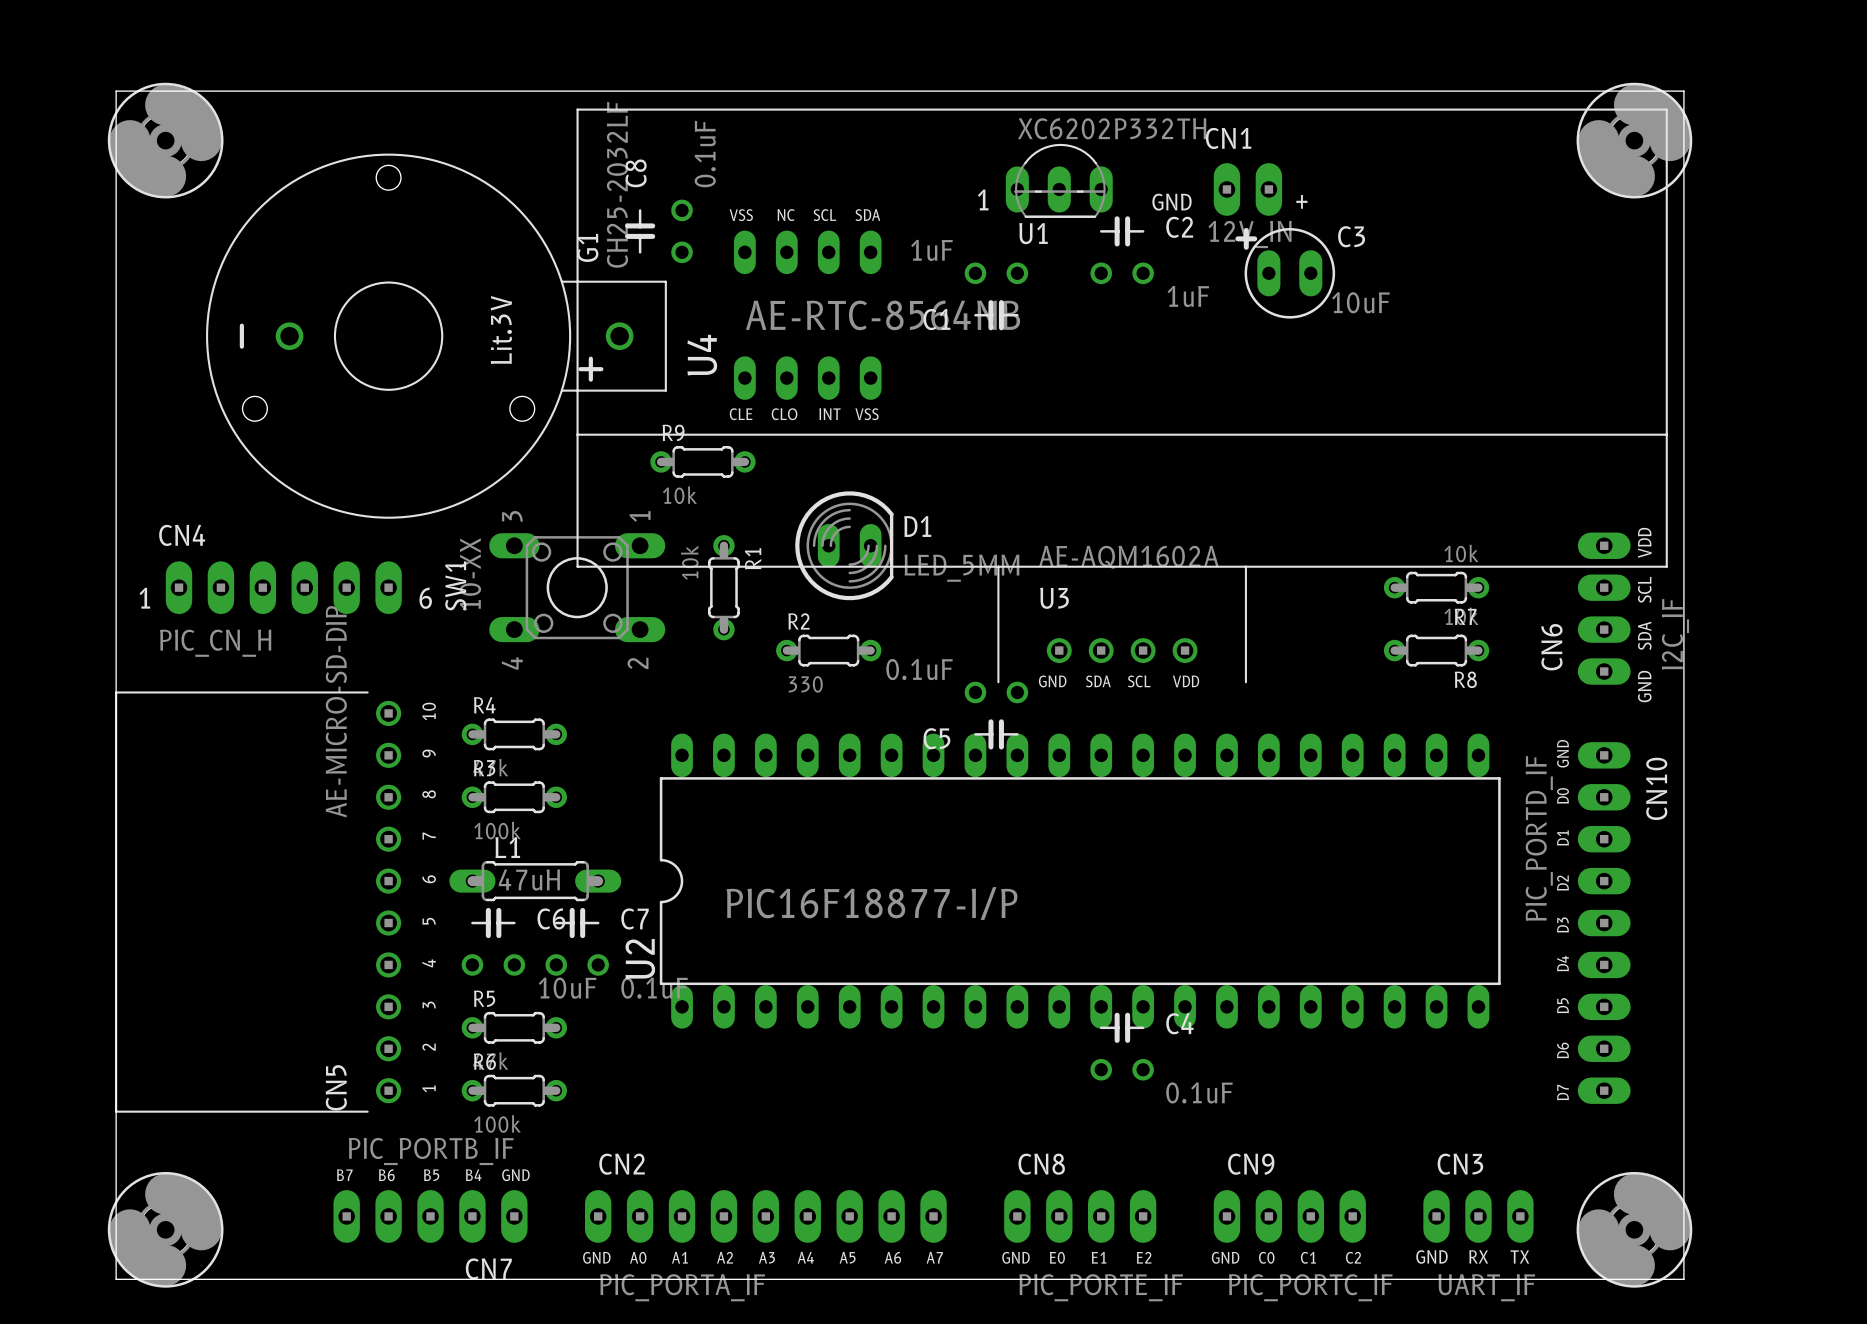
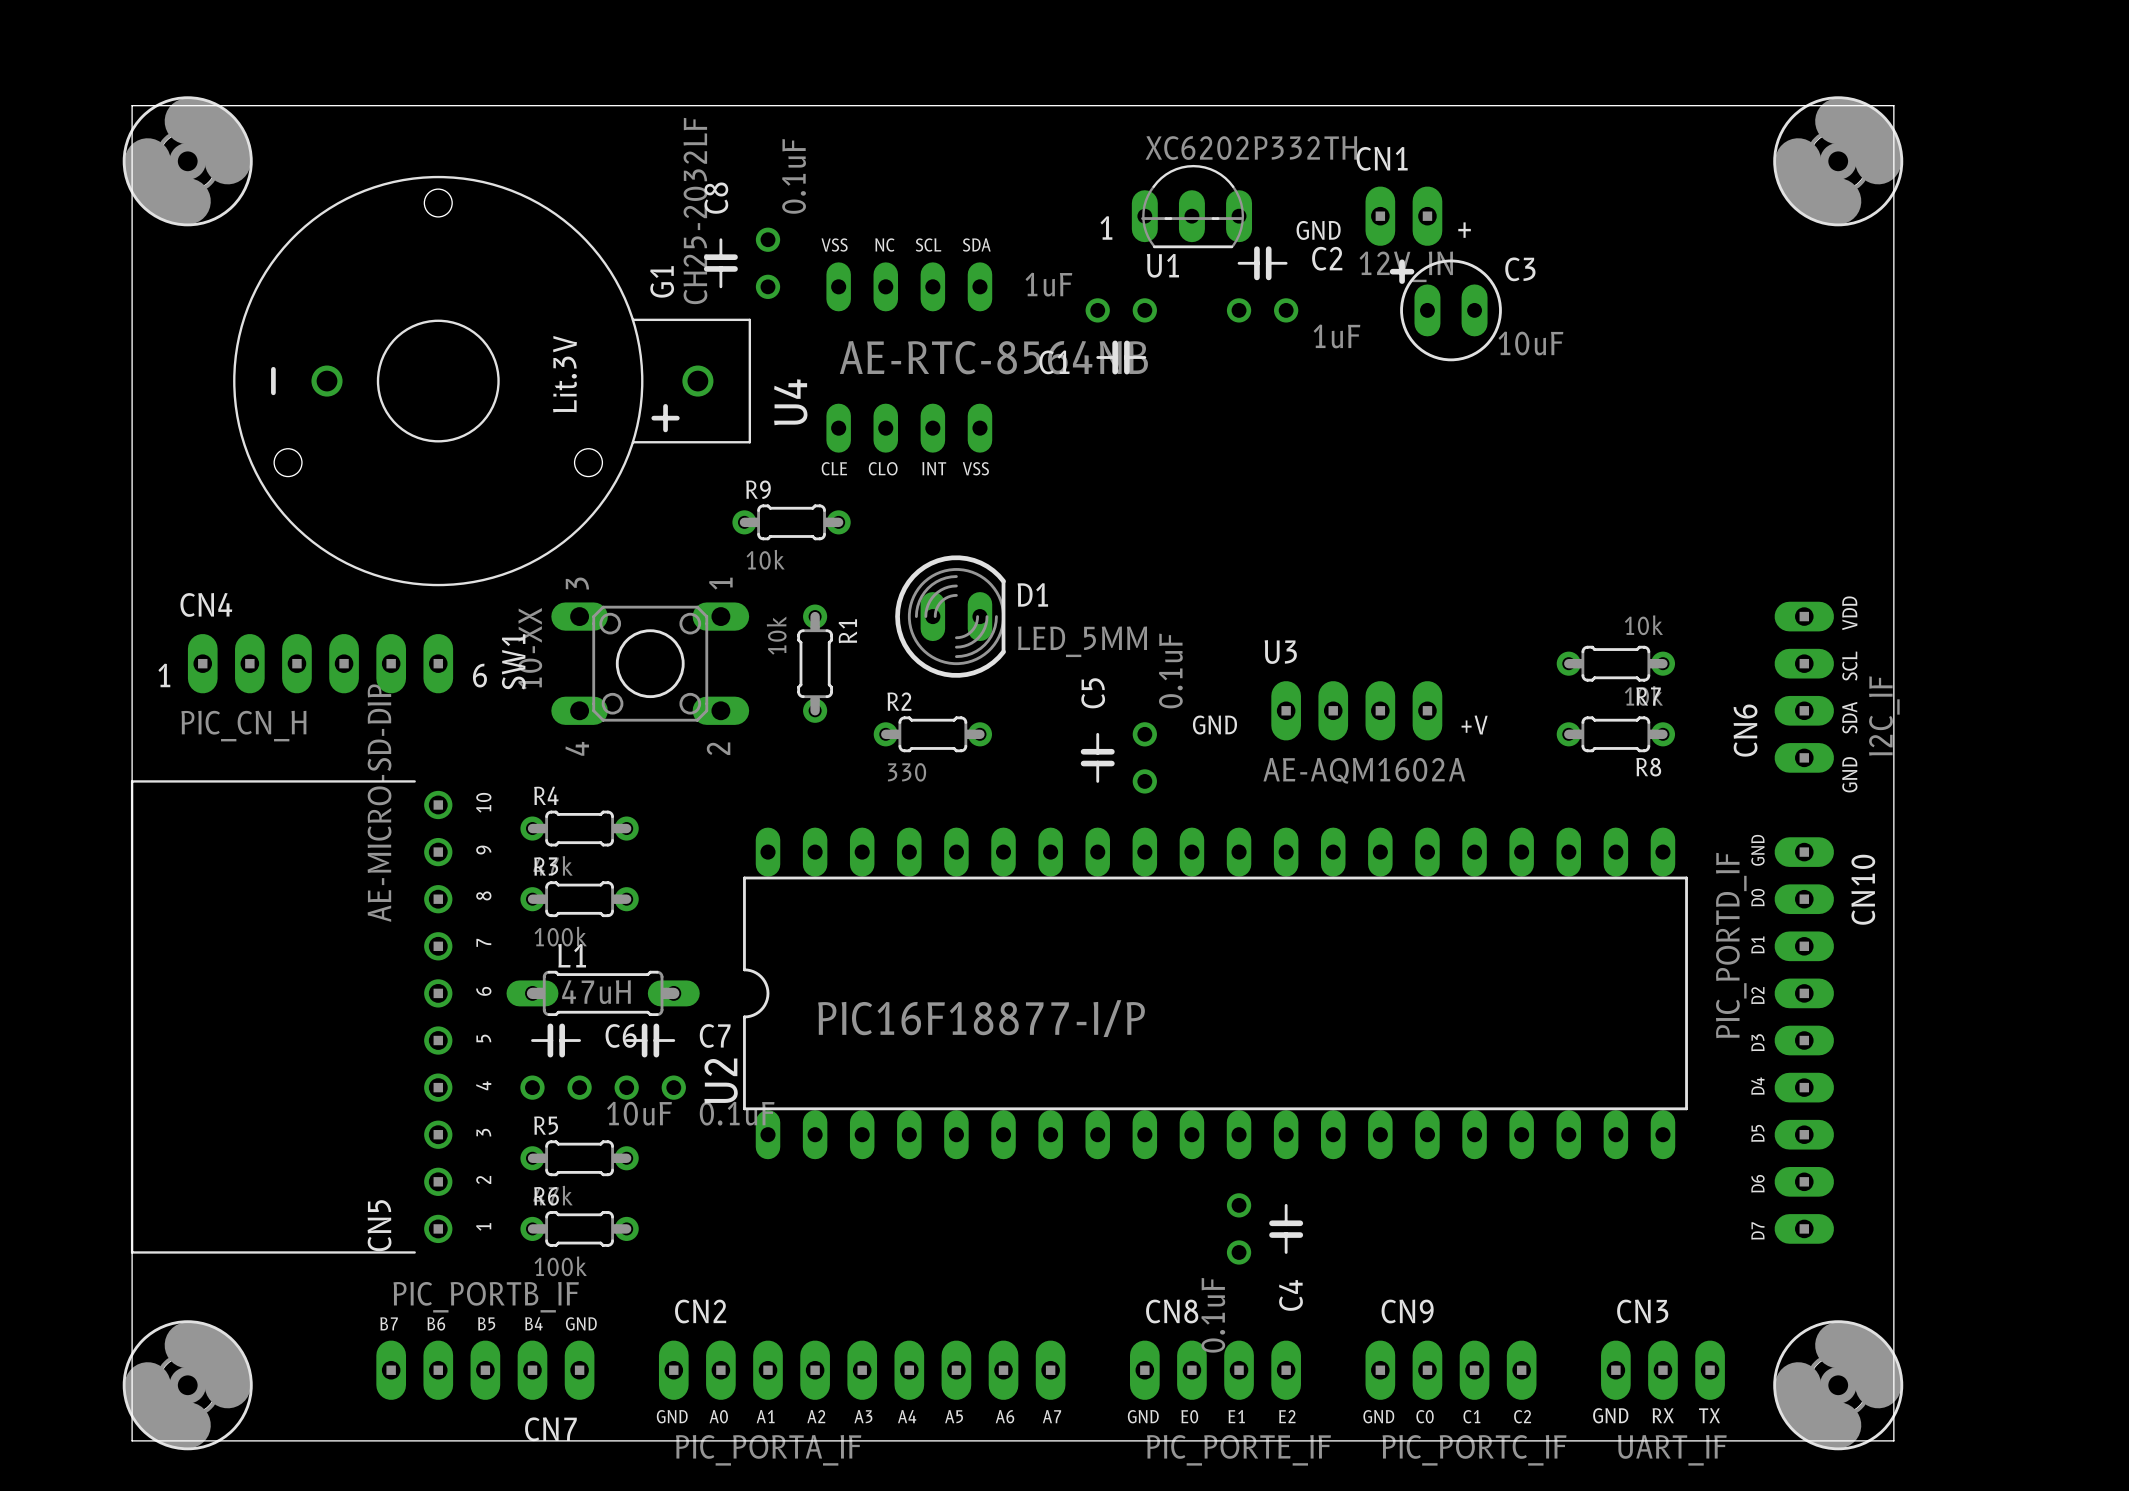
U3 footprint: [576, 108, 1669, 684] -> [1271, 681, 1443, 741]
U3 value position: AE-AQM1602A (1128, 557) -> AE-AQM1602A (1364, 770)
U3 name position: U3 (1054, 598) -> U3 (1280, 652)
C5 rotation: 0° (996, 715) -> 90° clockwise (1118, 757)
C5 position: (996, 715) -> (1118, 757)
C4 rotation: 0° (1122, 1046) -> 90° clockwise (1265, 1228)
C4 position: (1122, 1046) -> (1265, 1228)

